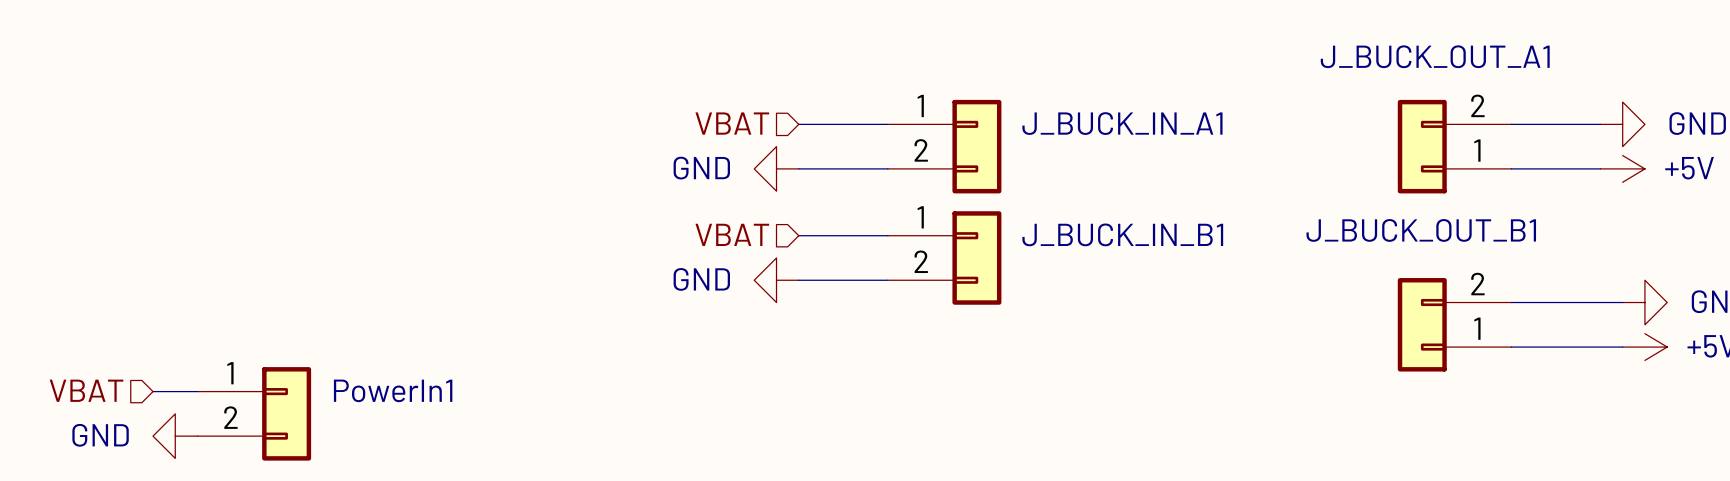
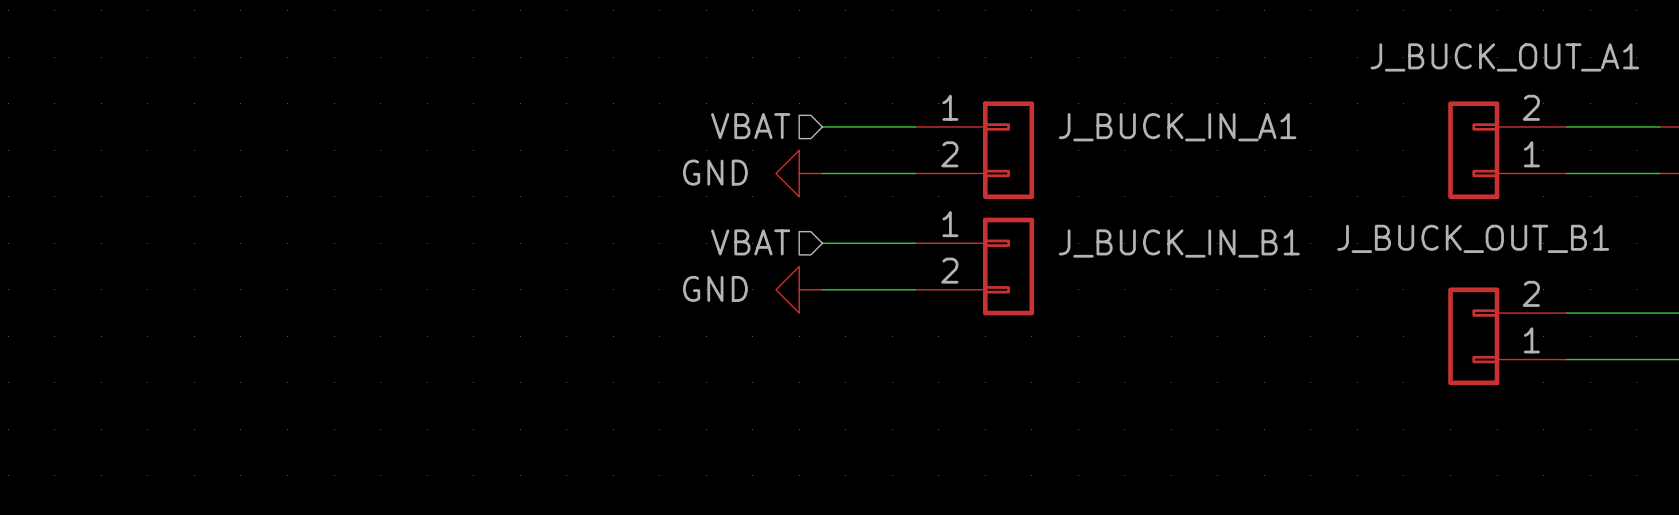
hierarchical label: VBAT (86, 390) -> none
wire: (153, 391) (197, 391) -> none
PowerIn1: (254, 413) -> none
power symbol: GND (175, 436) -> none

